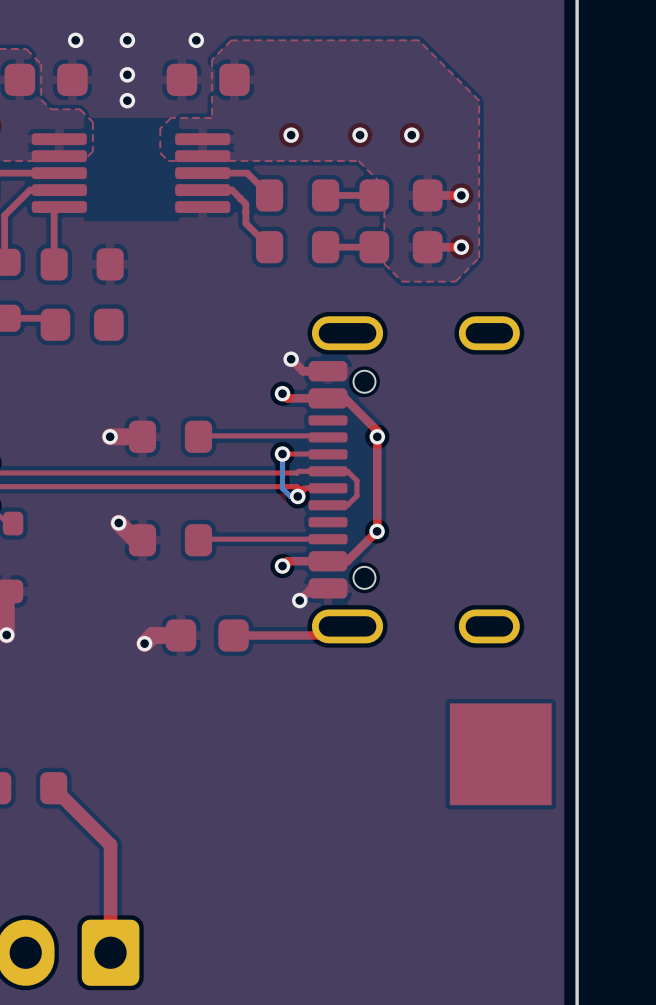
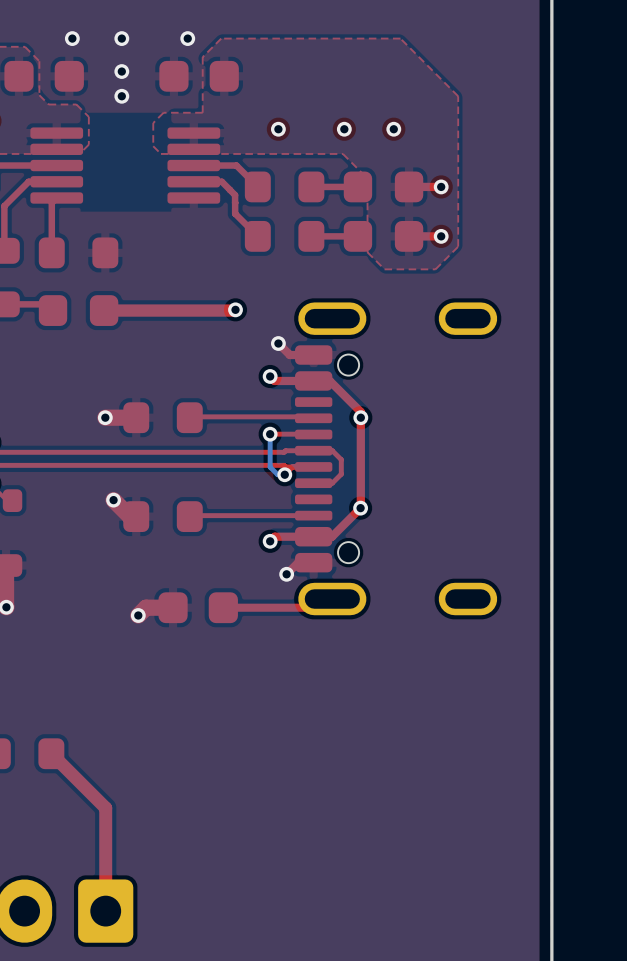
top track: none -> (235, 309) (104, 310)
via: none -> (235, 309)
part: (500, 754) -> none

